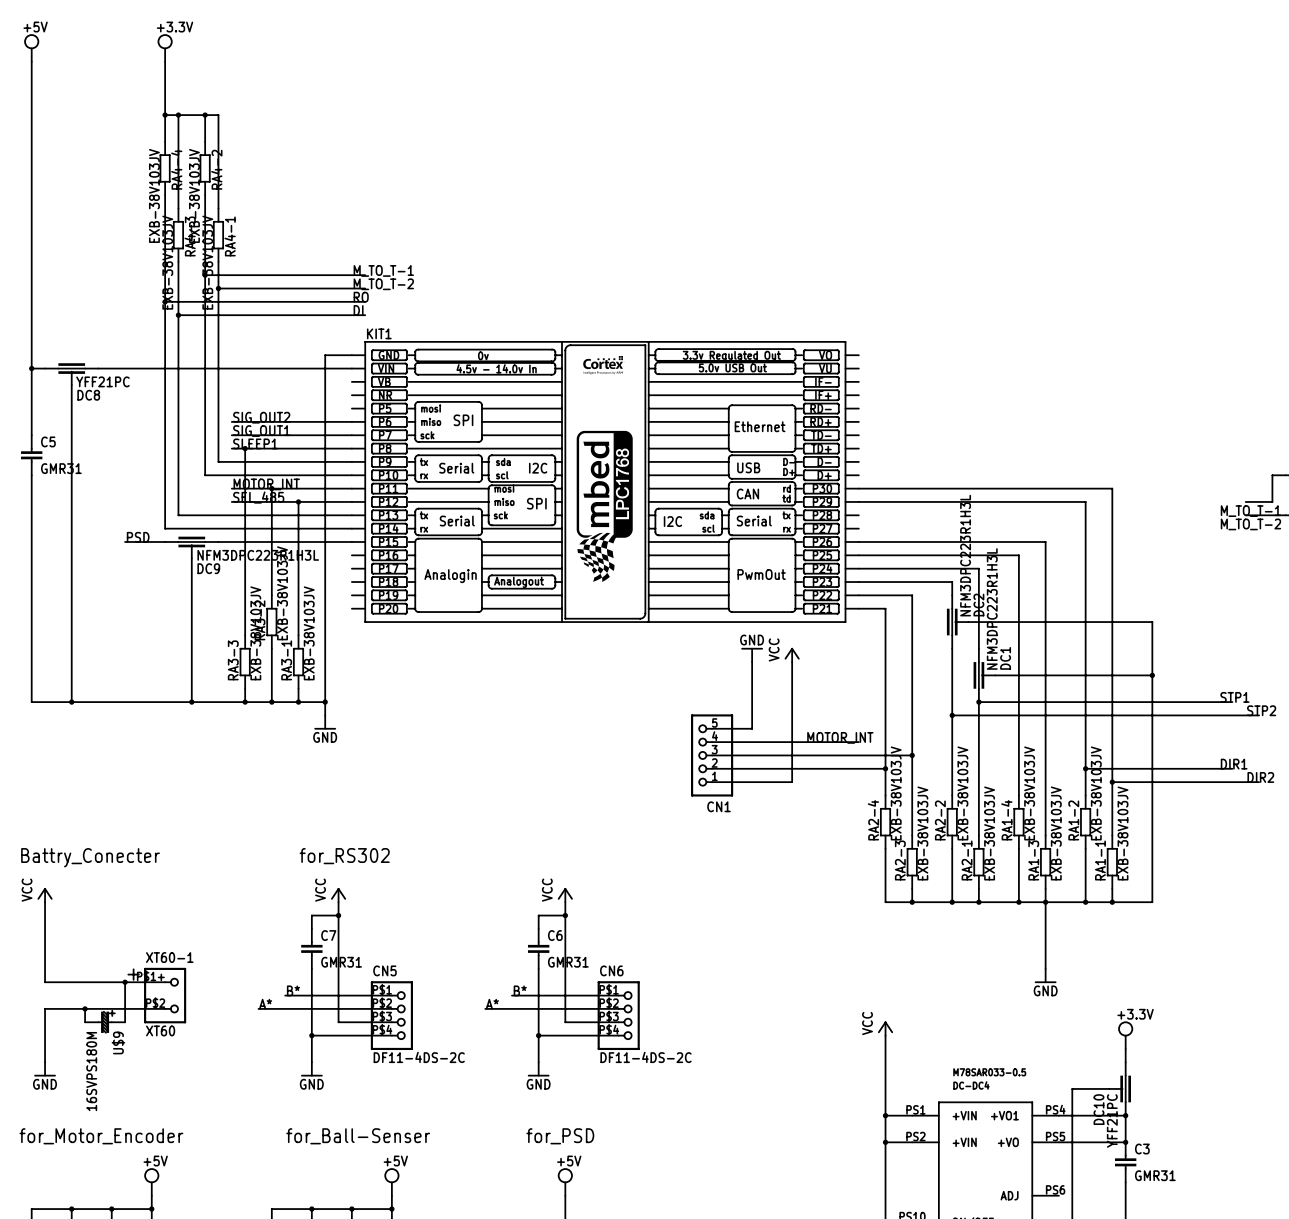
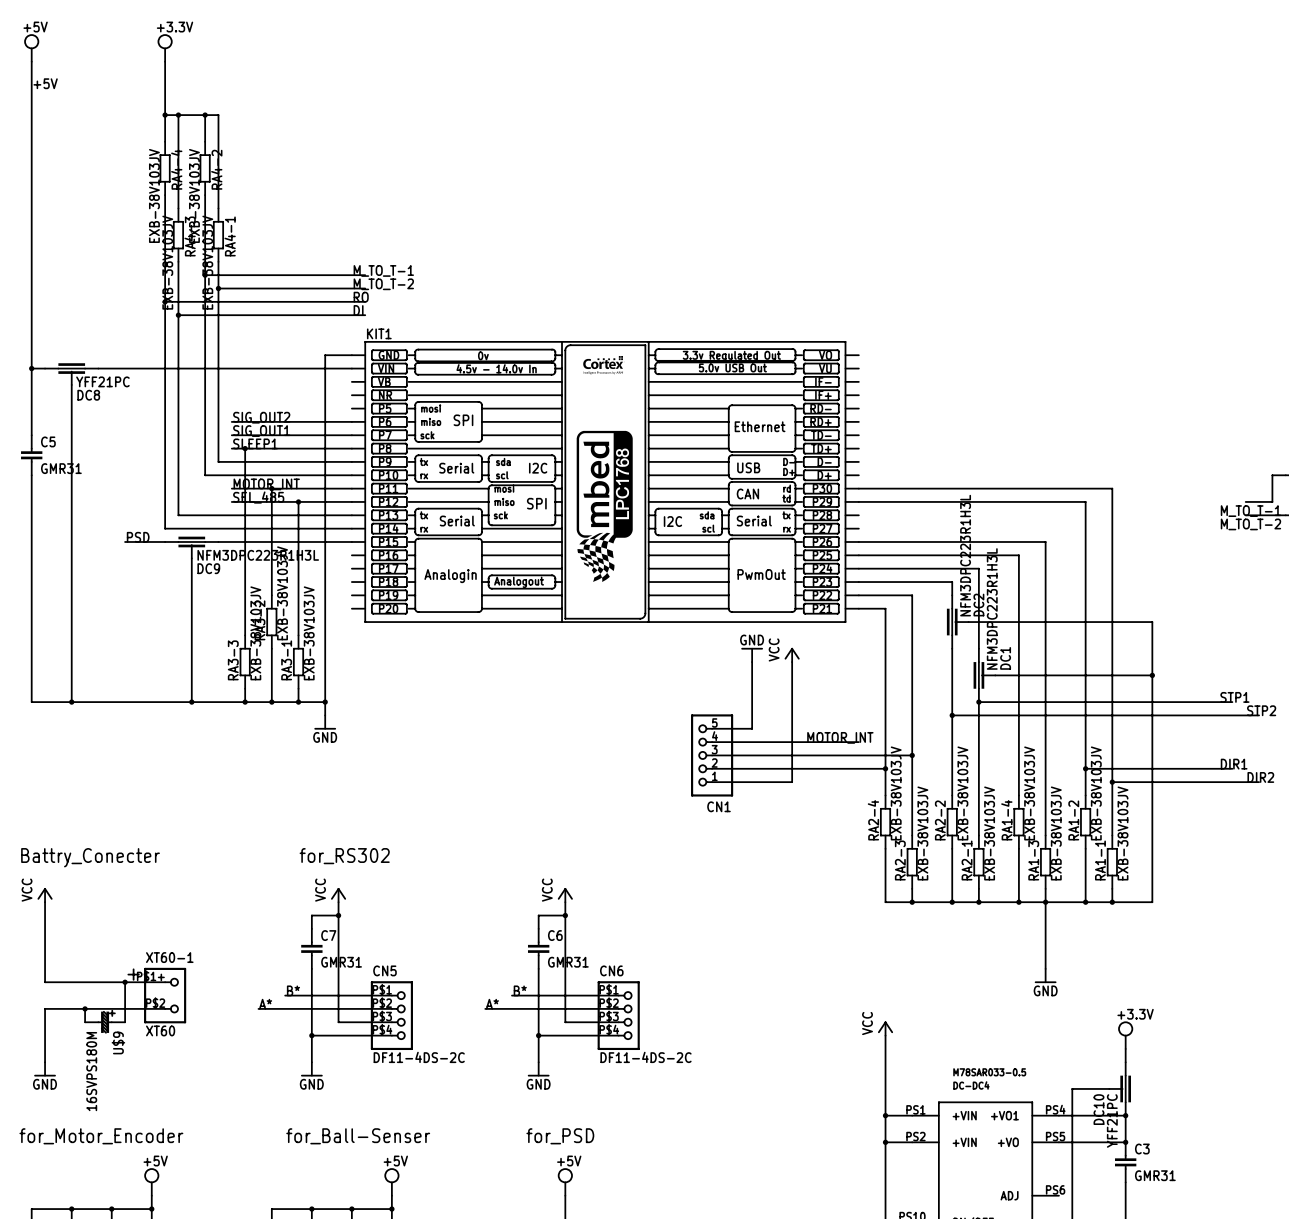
label: none -> +5V (45, 83)

